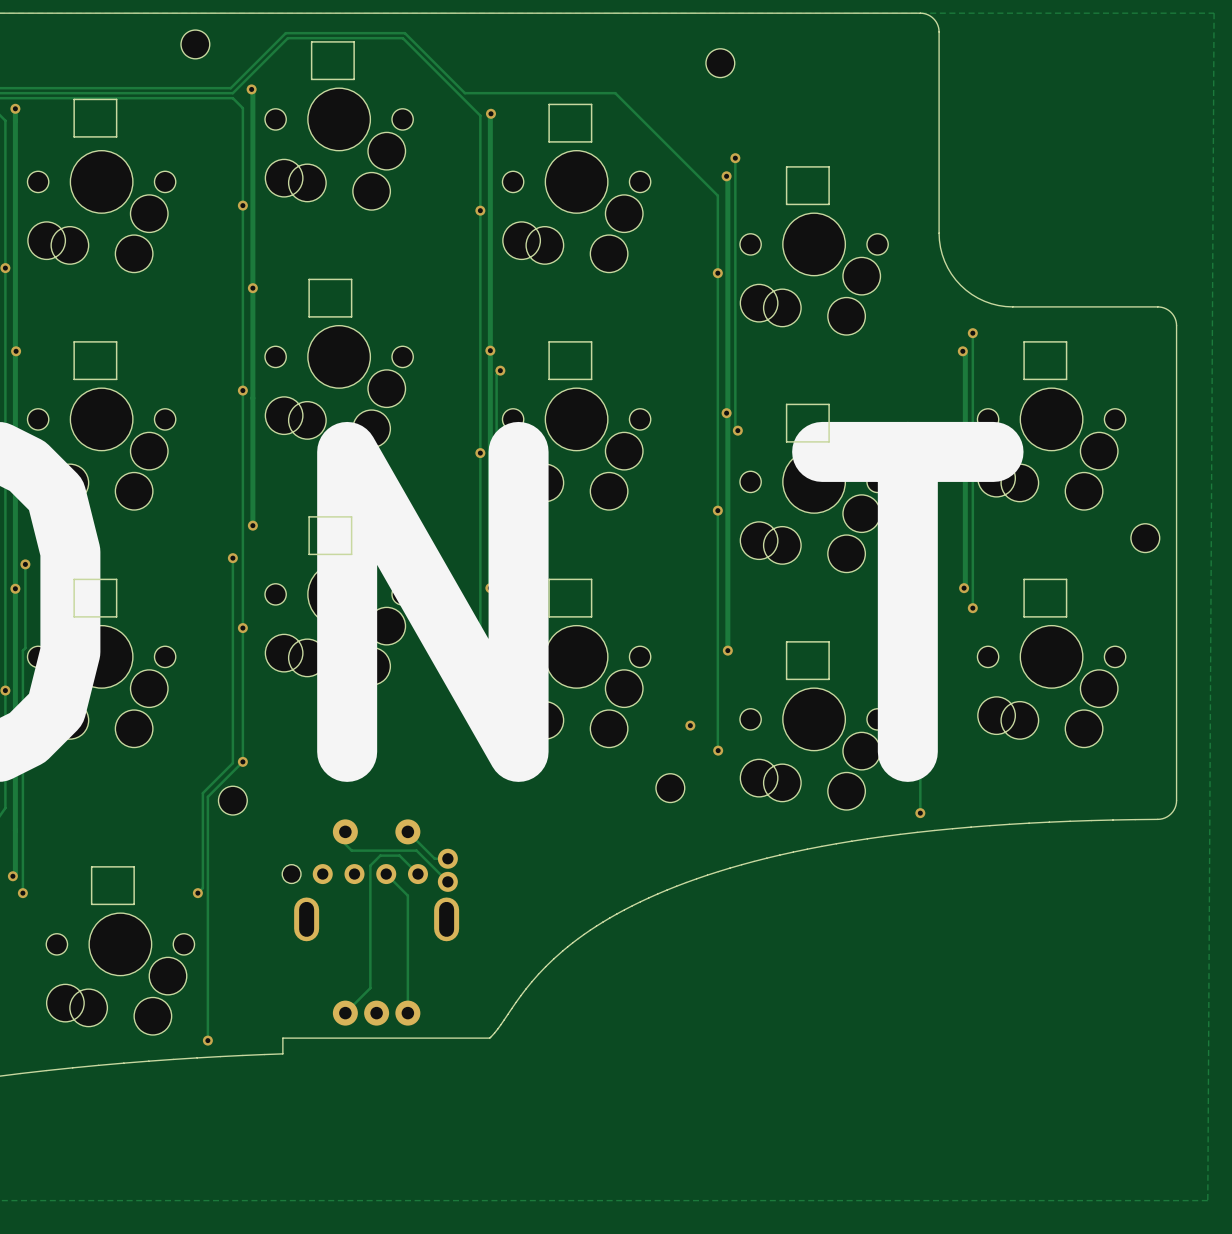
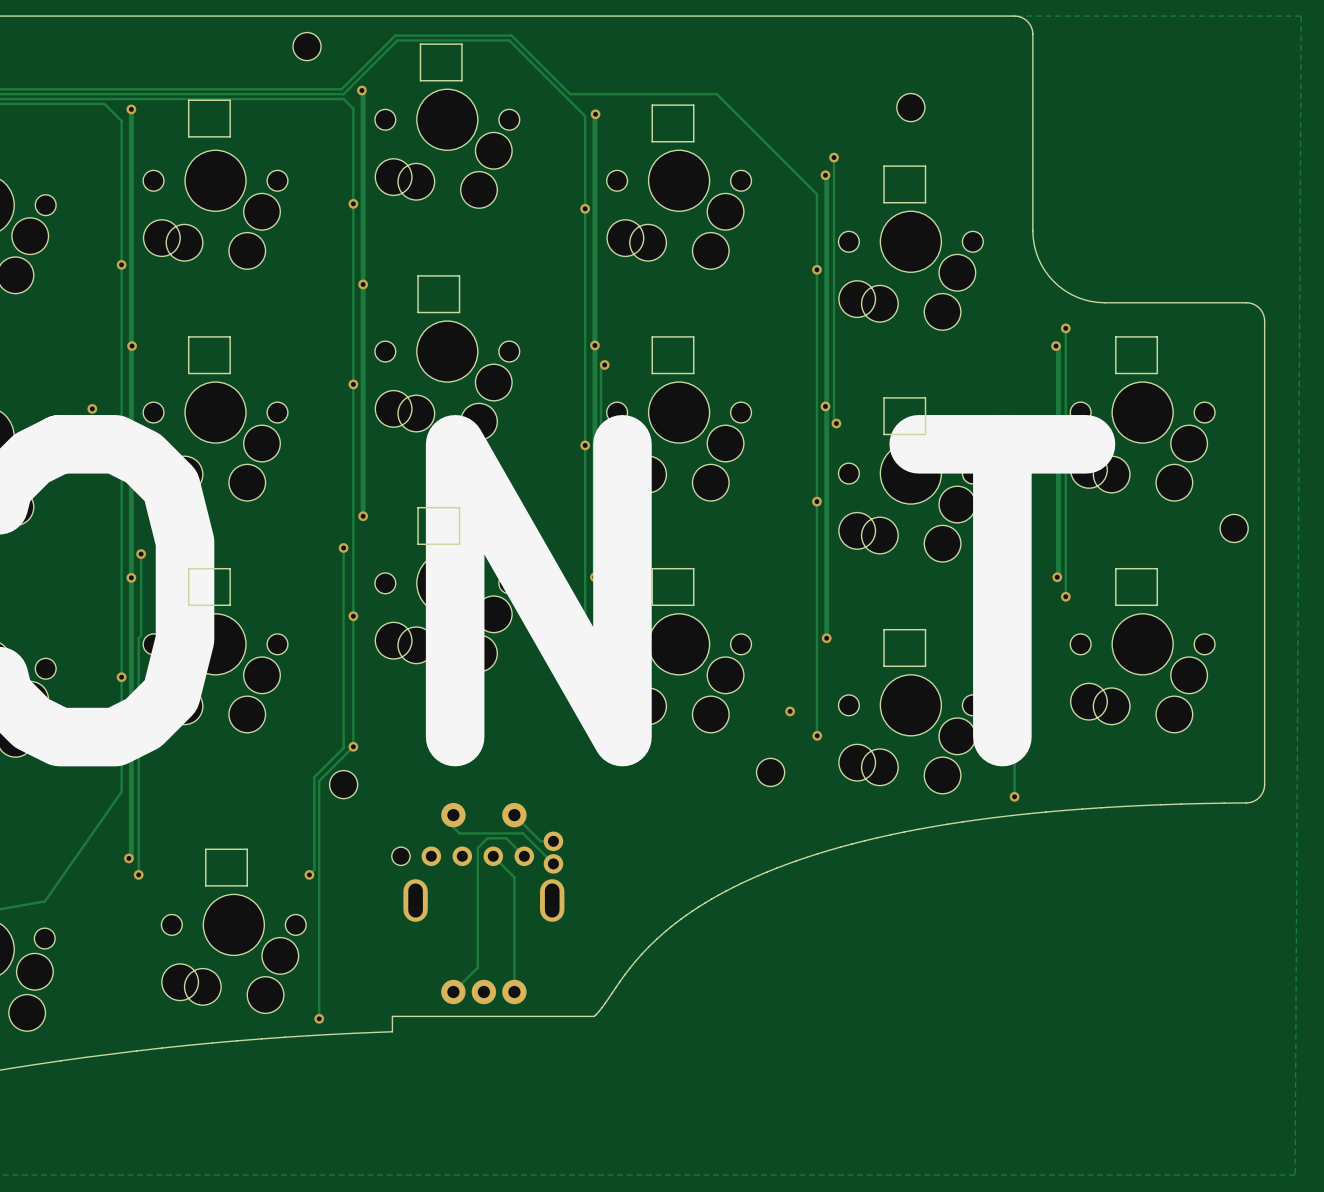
part position: (720, 63) -> (910, 107)

